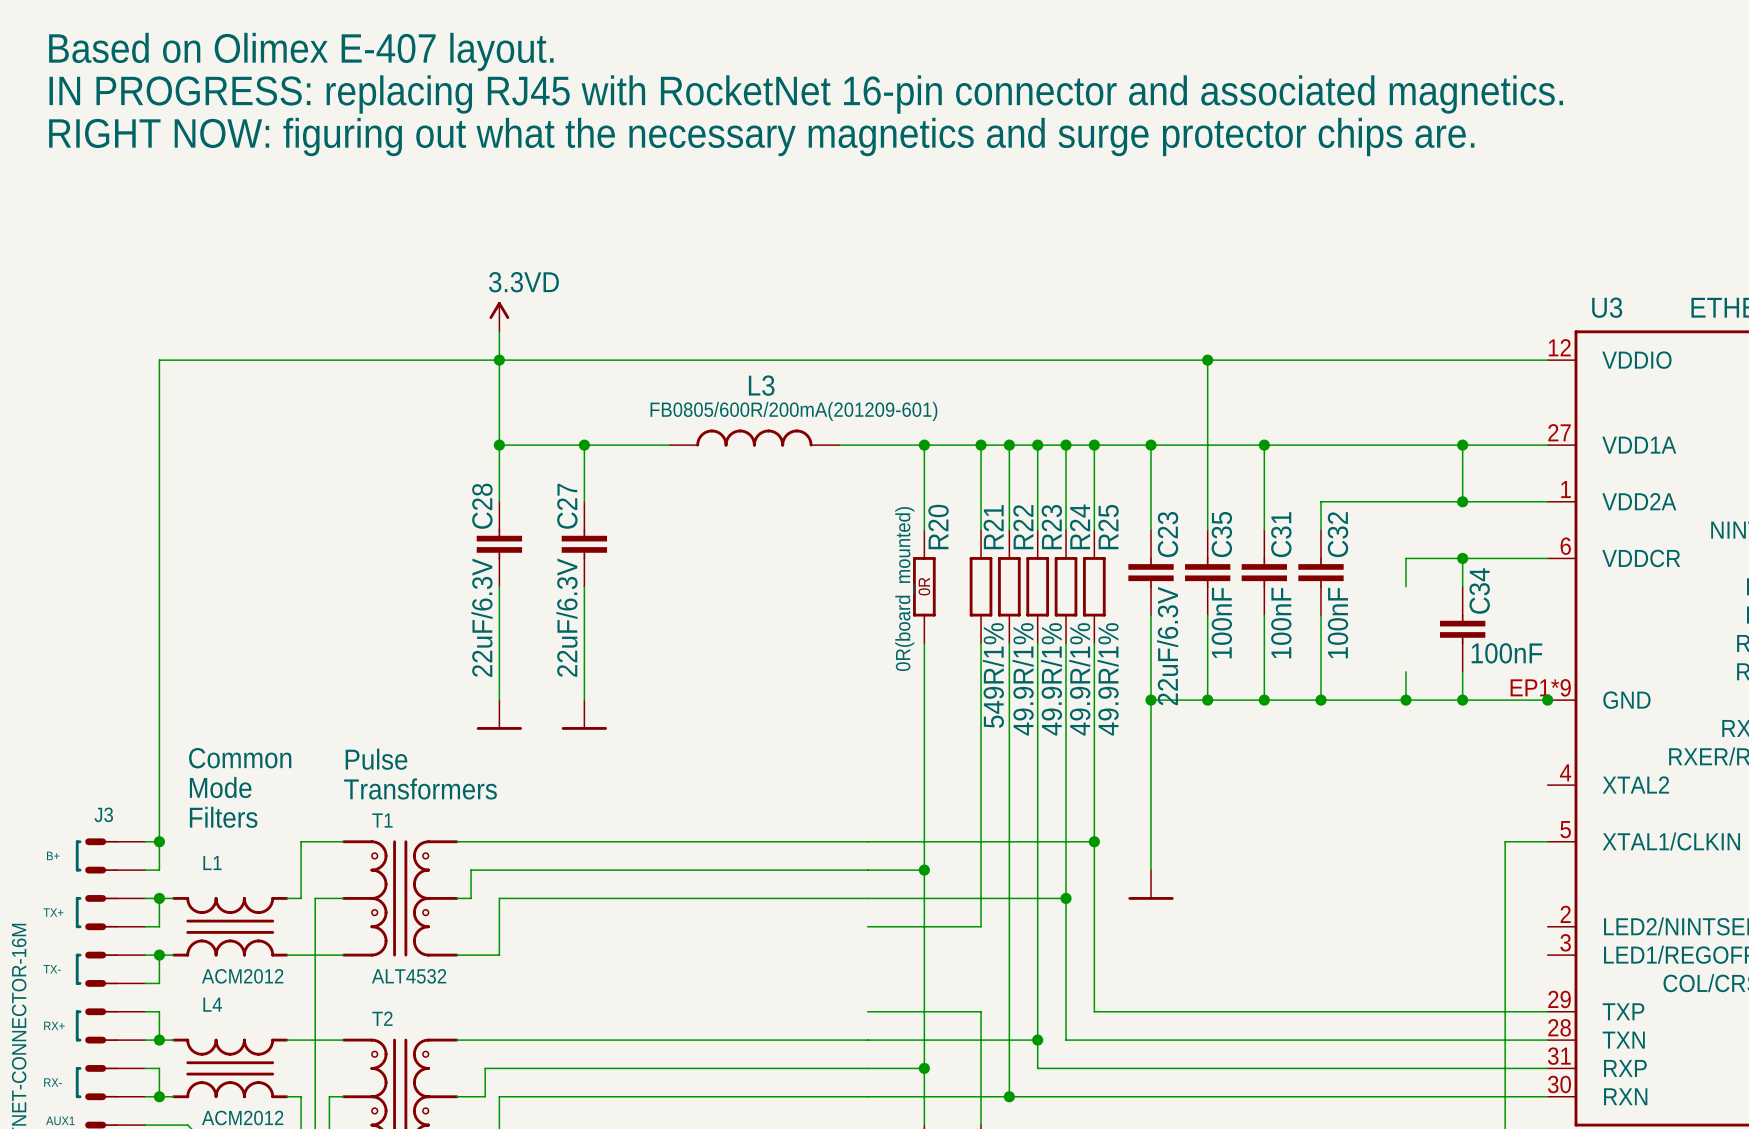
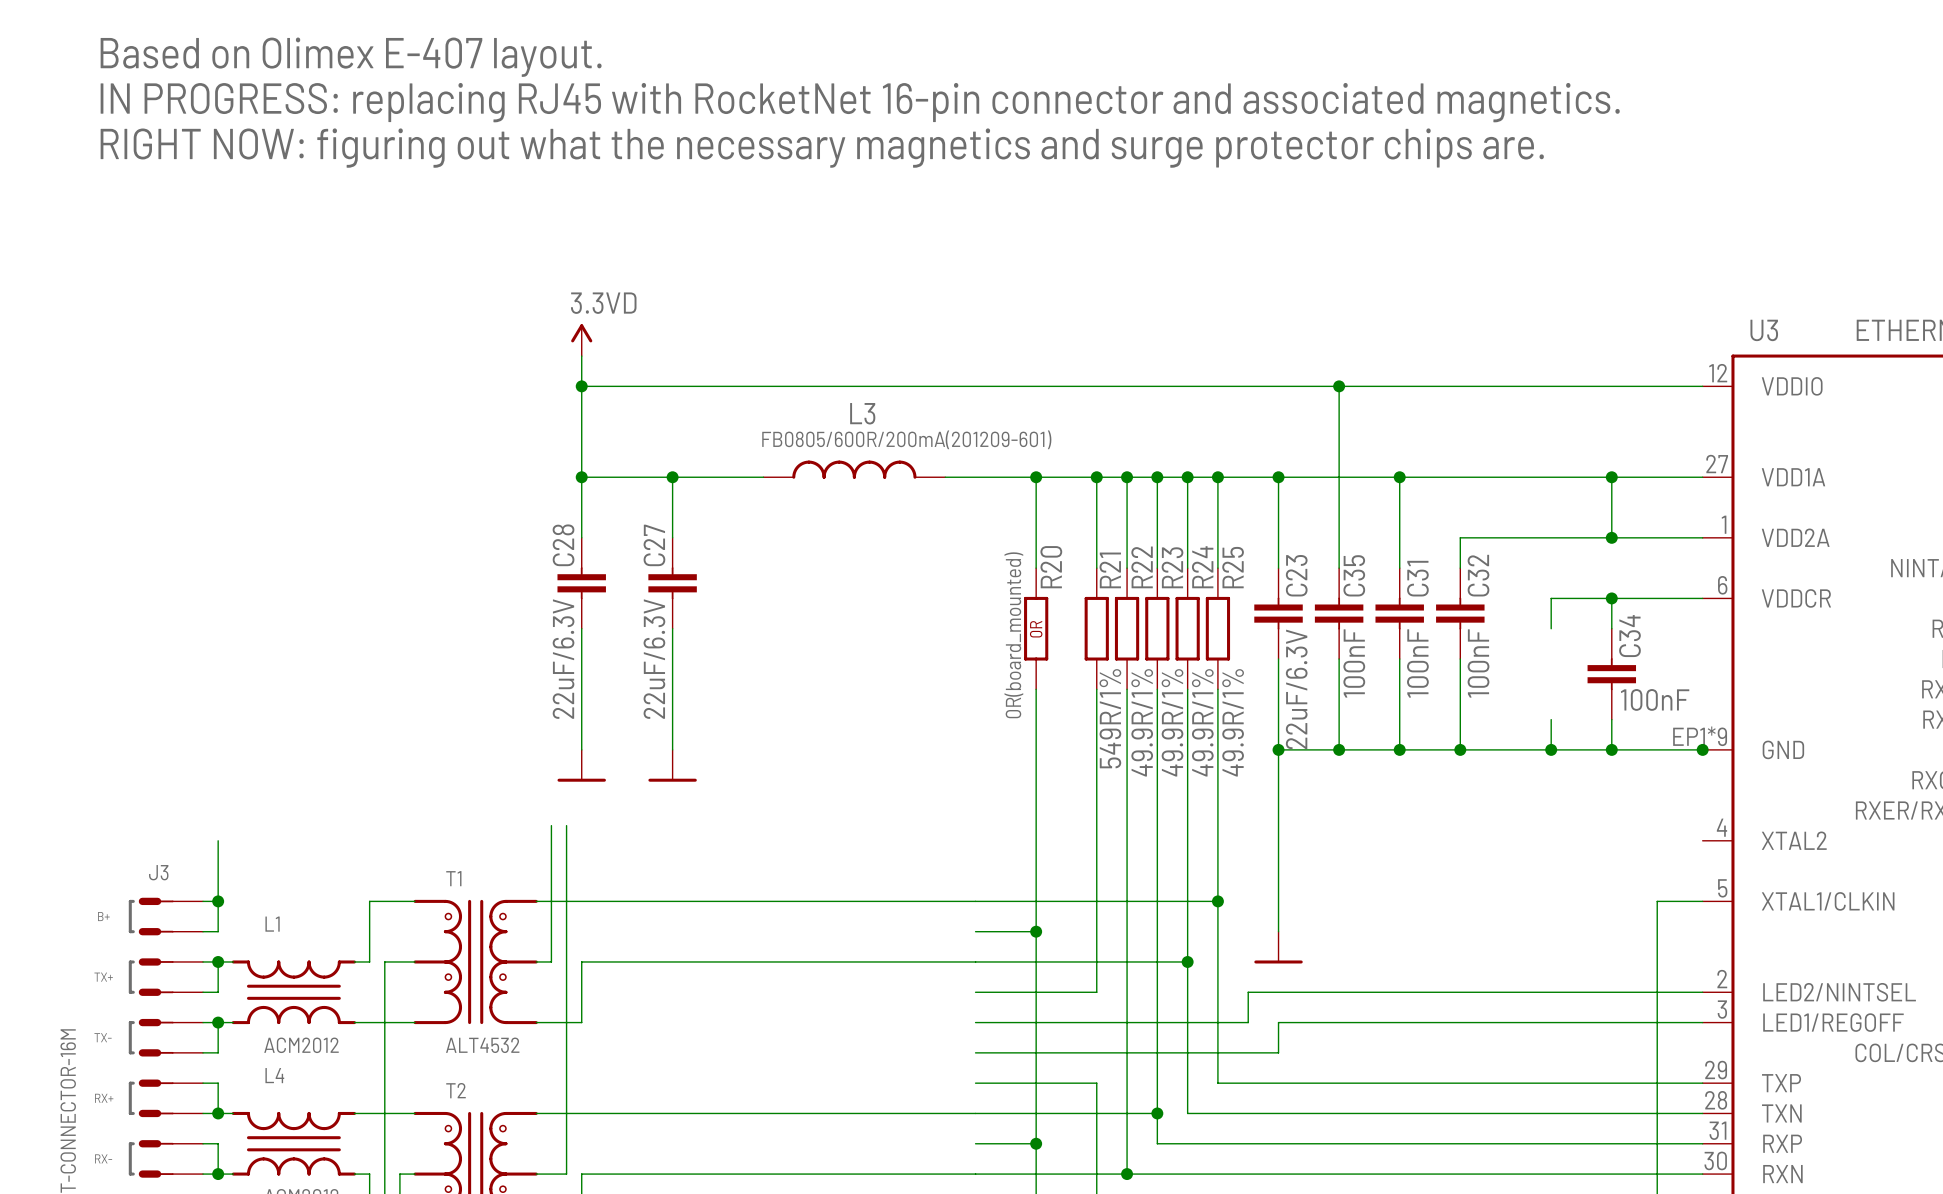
wire: (499, 360) (159, 360) (159, 785) -> none
text: Common (240, 758) -> none
text: Pulse (376, 759) -> none
text: Mode (220, 787) -> none
text: Transformers (420, 788) -> none
text: Filters (223, 817) -> none
wire: (471, 870) (867, 870) -> (551, 931) (551, 825)
wire: none -> (1702, 992) (1248, 992) (1248, 1022) (975, 1022)
wire: none -> (1702, 1022) (1278, 1022) (1278, 1052) (975, 1052)
wire: (485, 1068) (867, 1068) -> (566, 1143) (566, 825)

